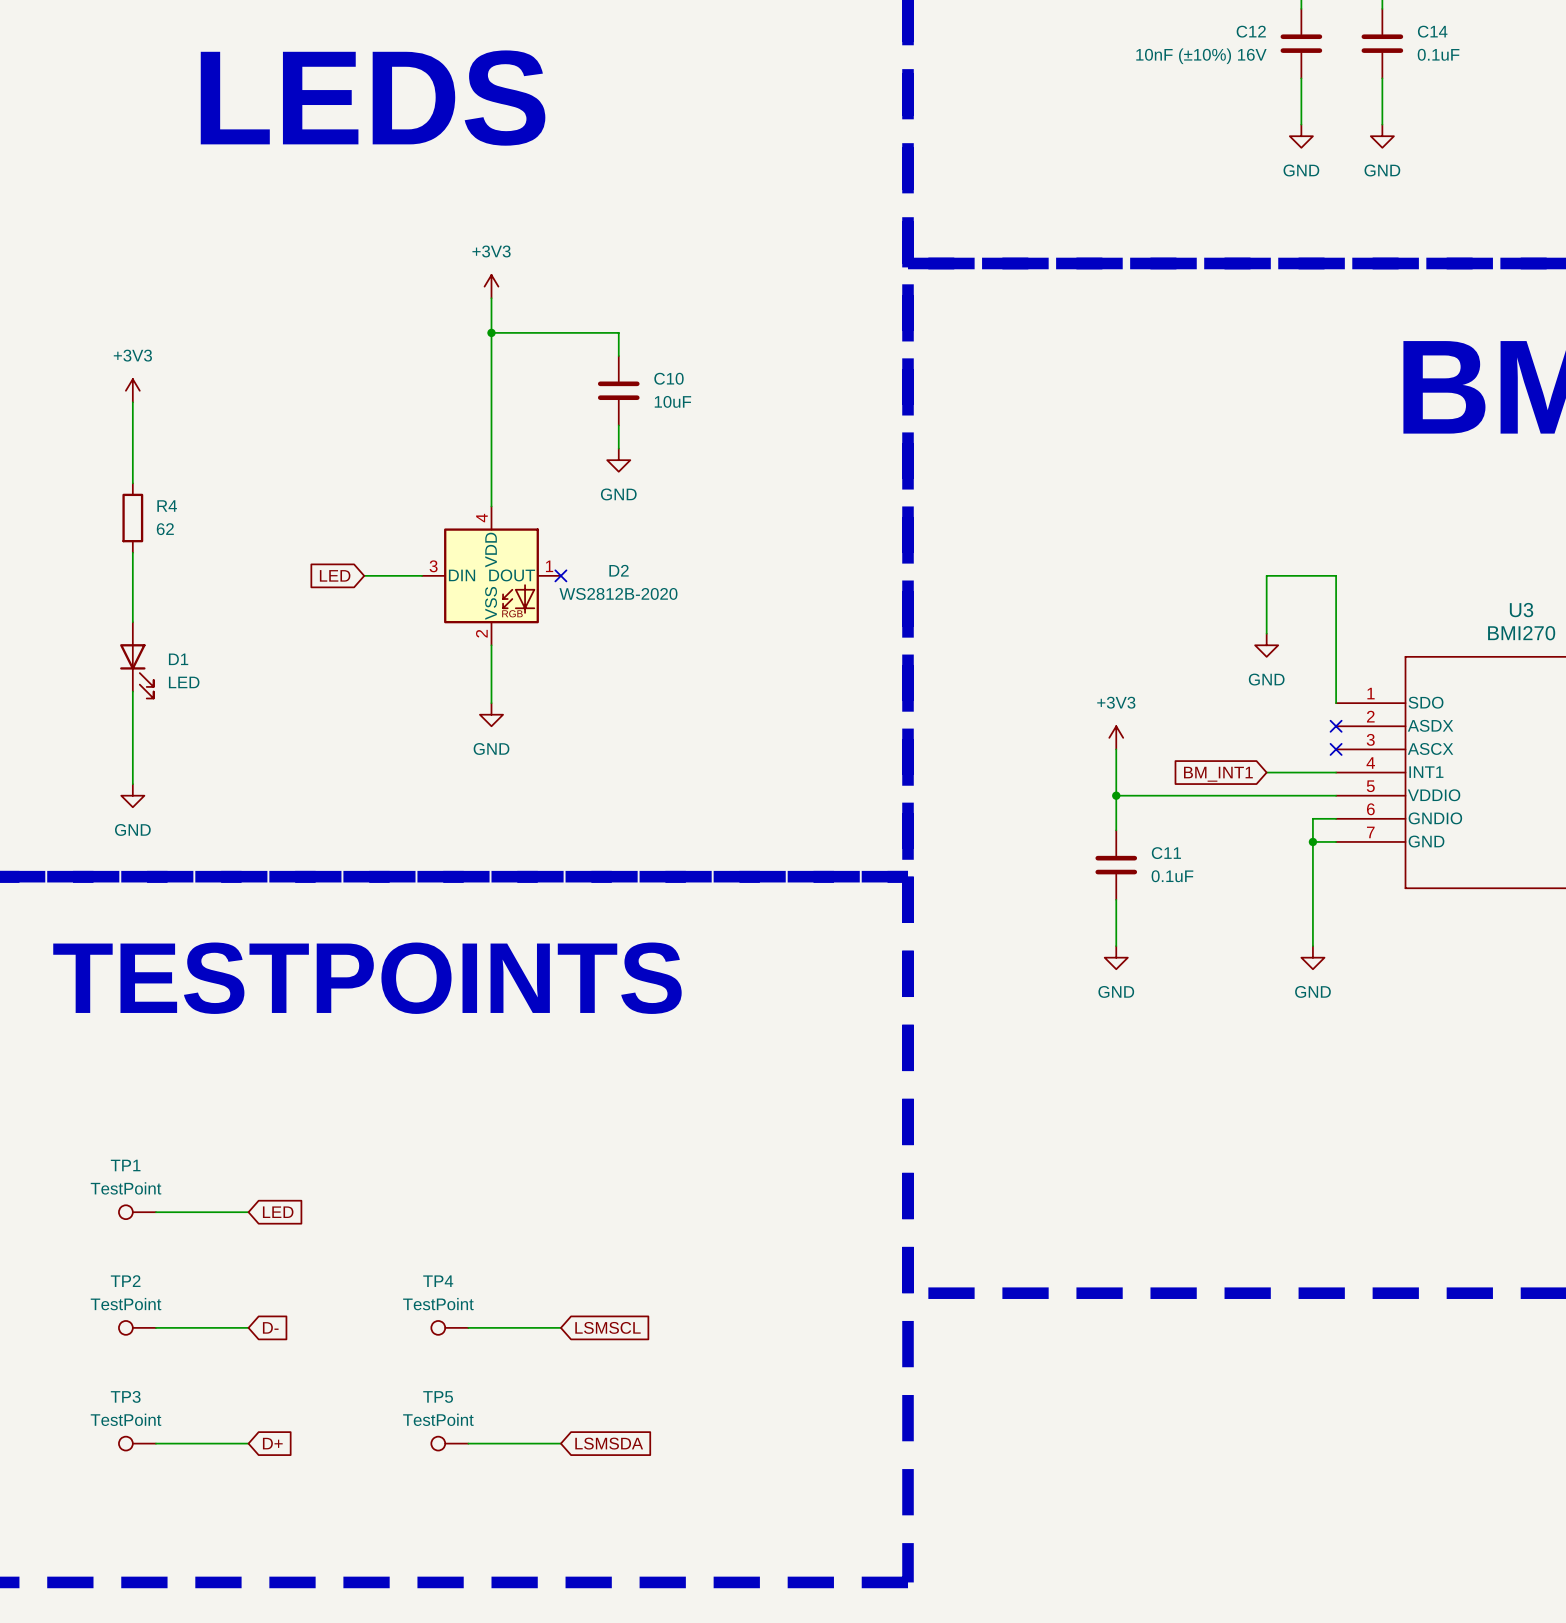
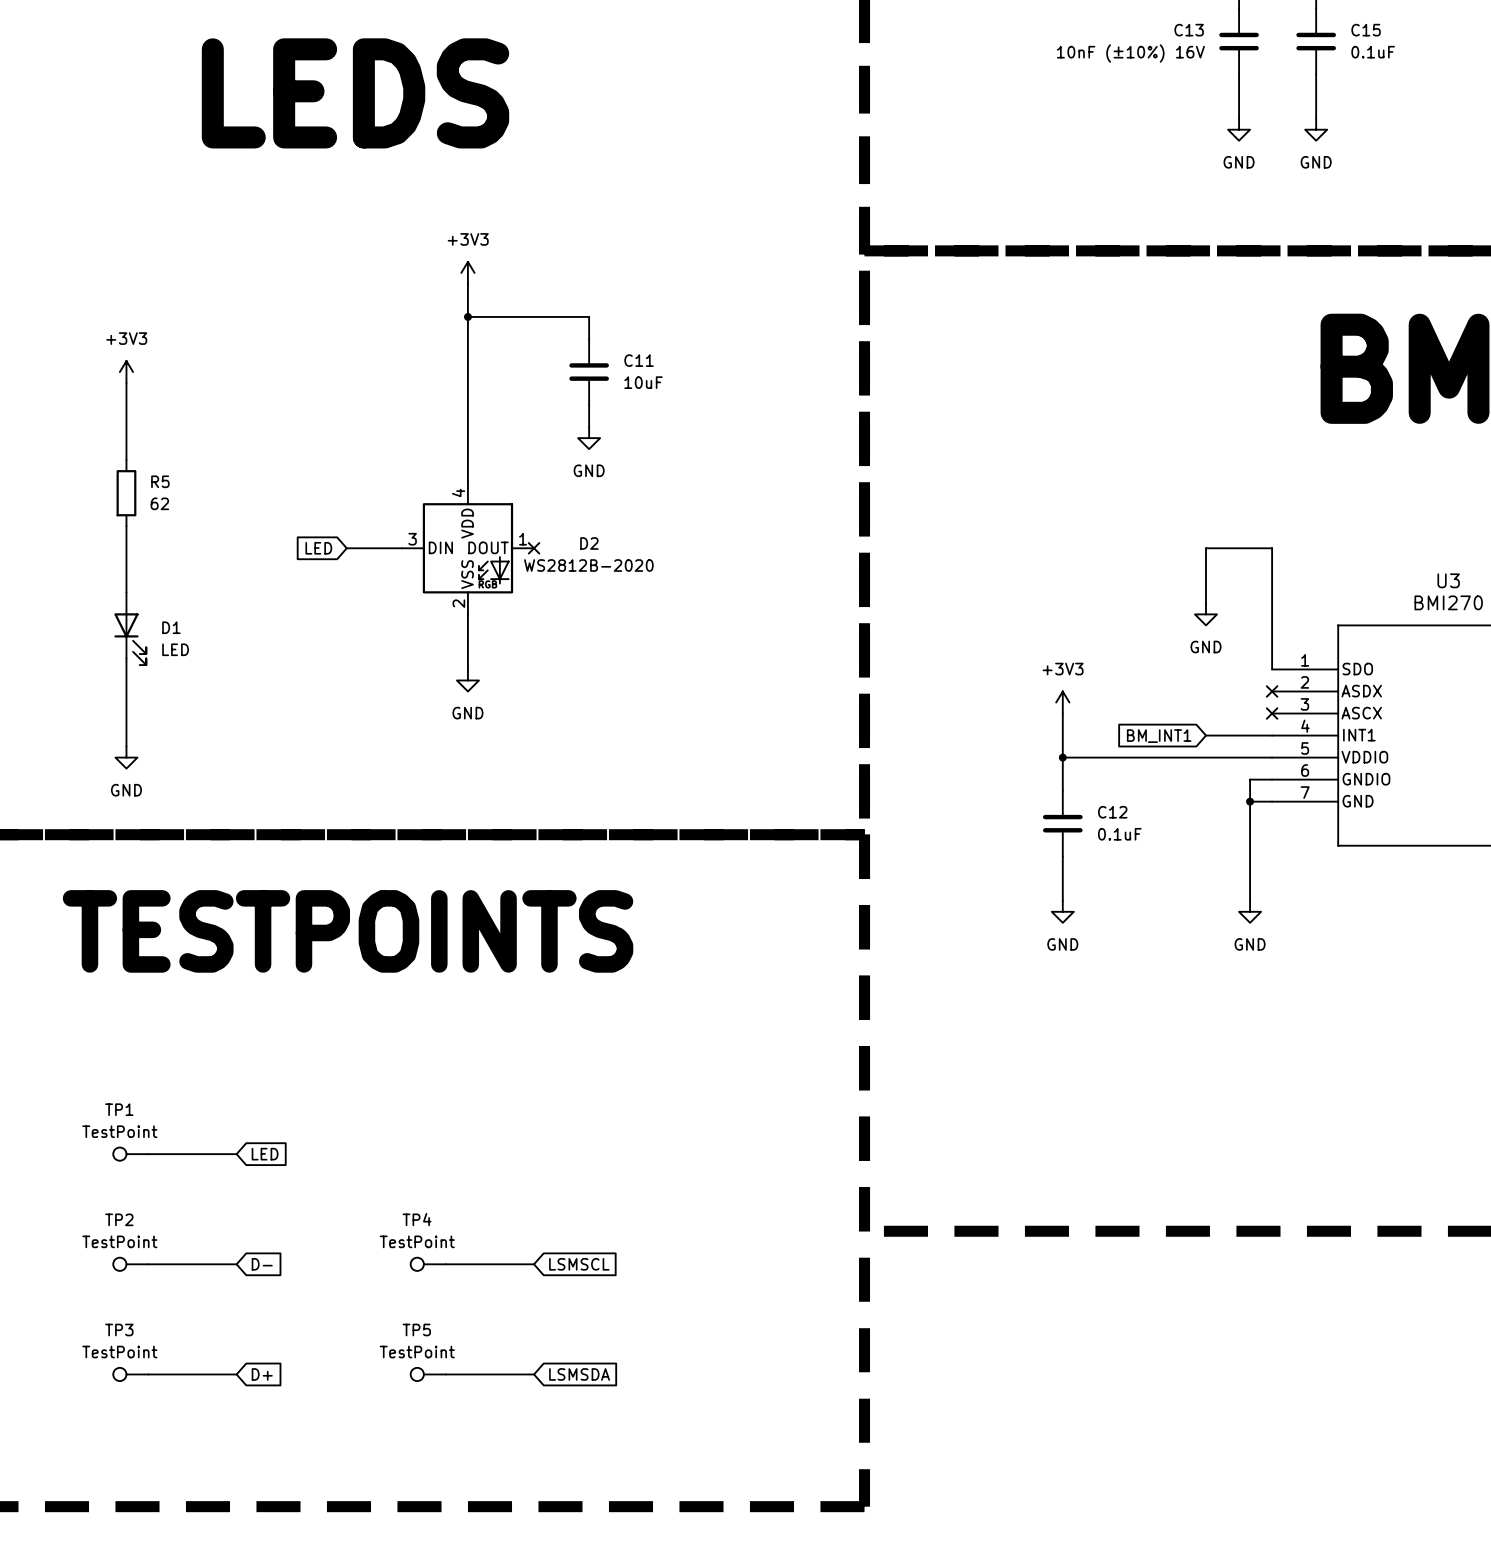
C12 name: C12 (1251, 31) -> C13 (1189, 30)
C14 name: C14 (1432, 31) -> C15 (1366, 30)
C10 name: C10 (668, 378) -> C11 (639, 360)
R4 name: R4 (167, 506) -> R5 (160, 481)
C11 name: C11 (1166, 853) -> C12 (1112, 812)

